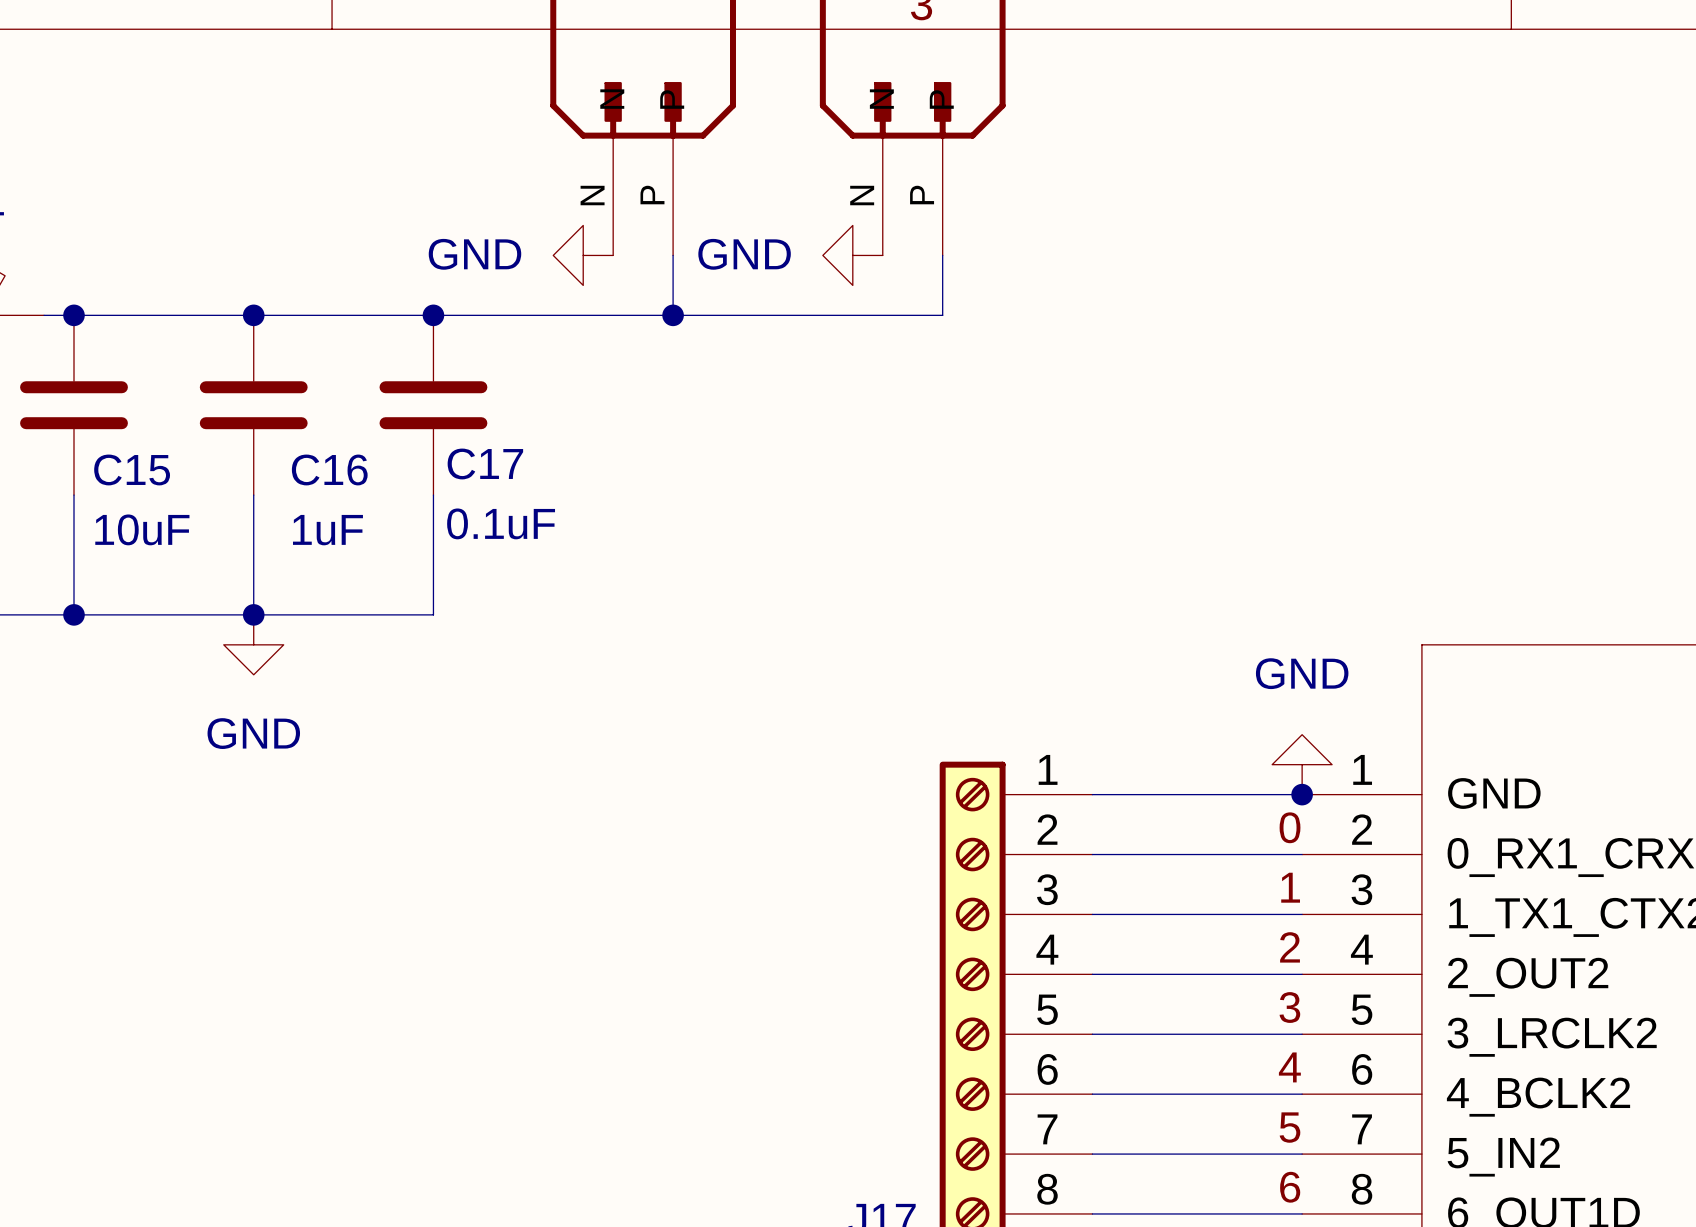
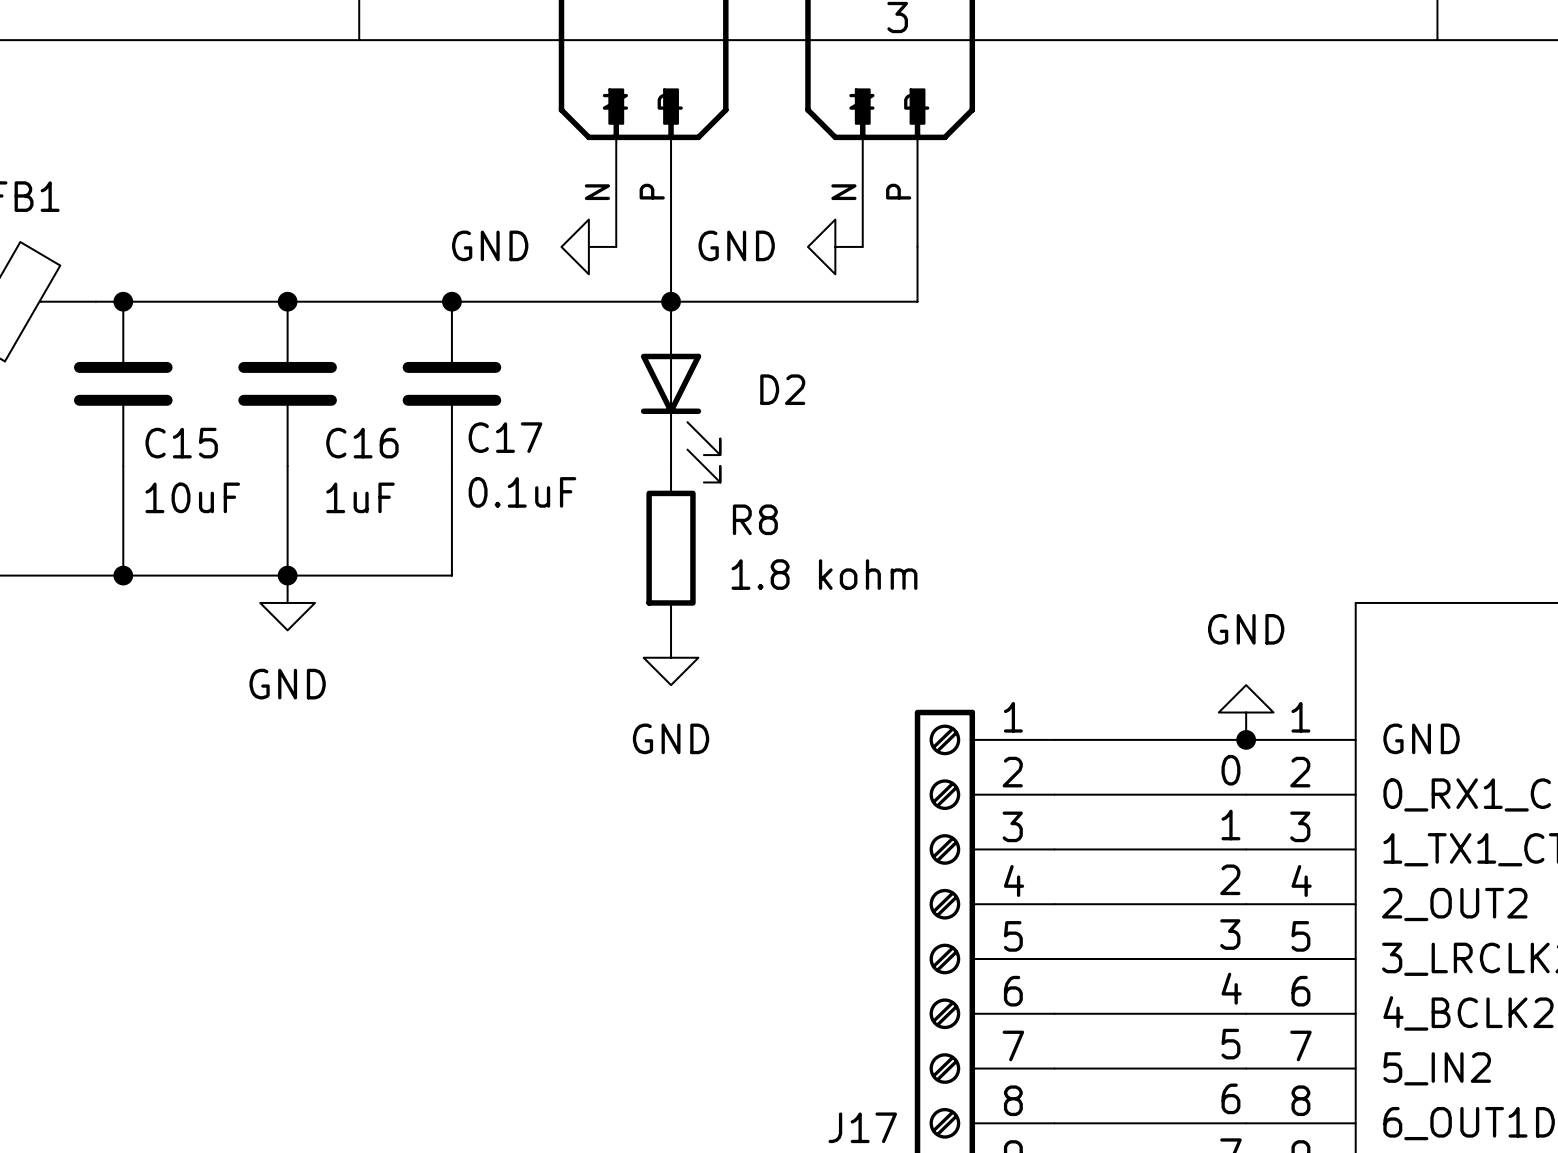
D2: none -> (680, 392)
R8: none -> 1.8 kohm (671, 548)
power symbol: none -> GND (671, 657)

